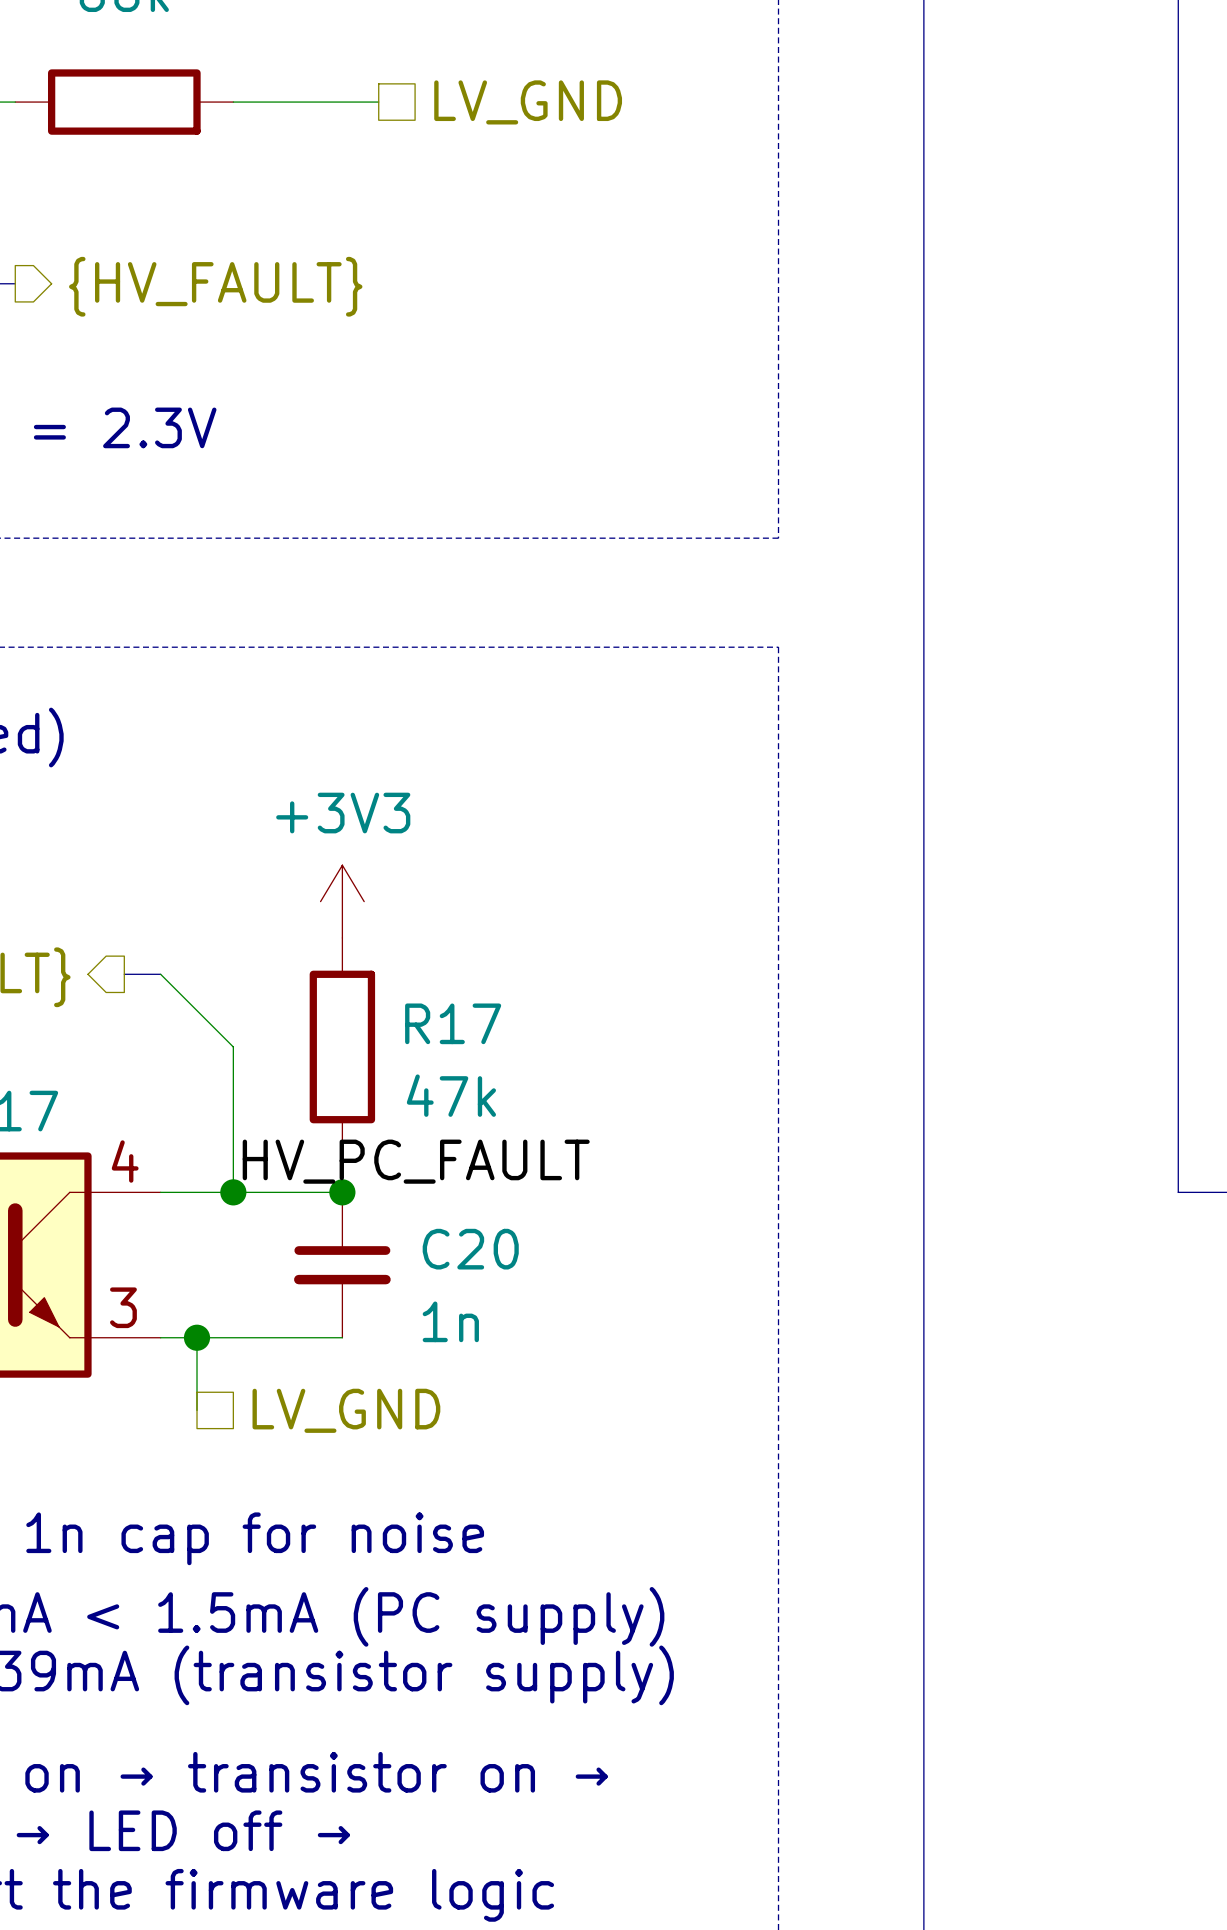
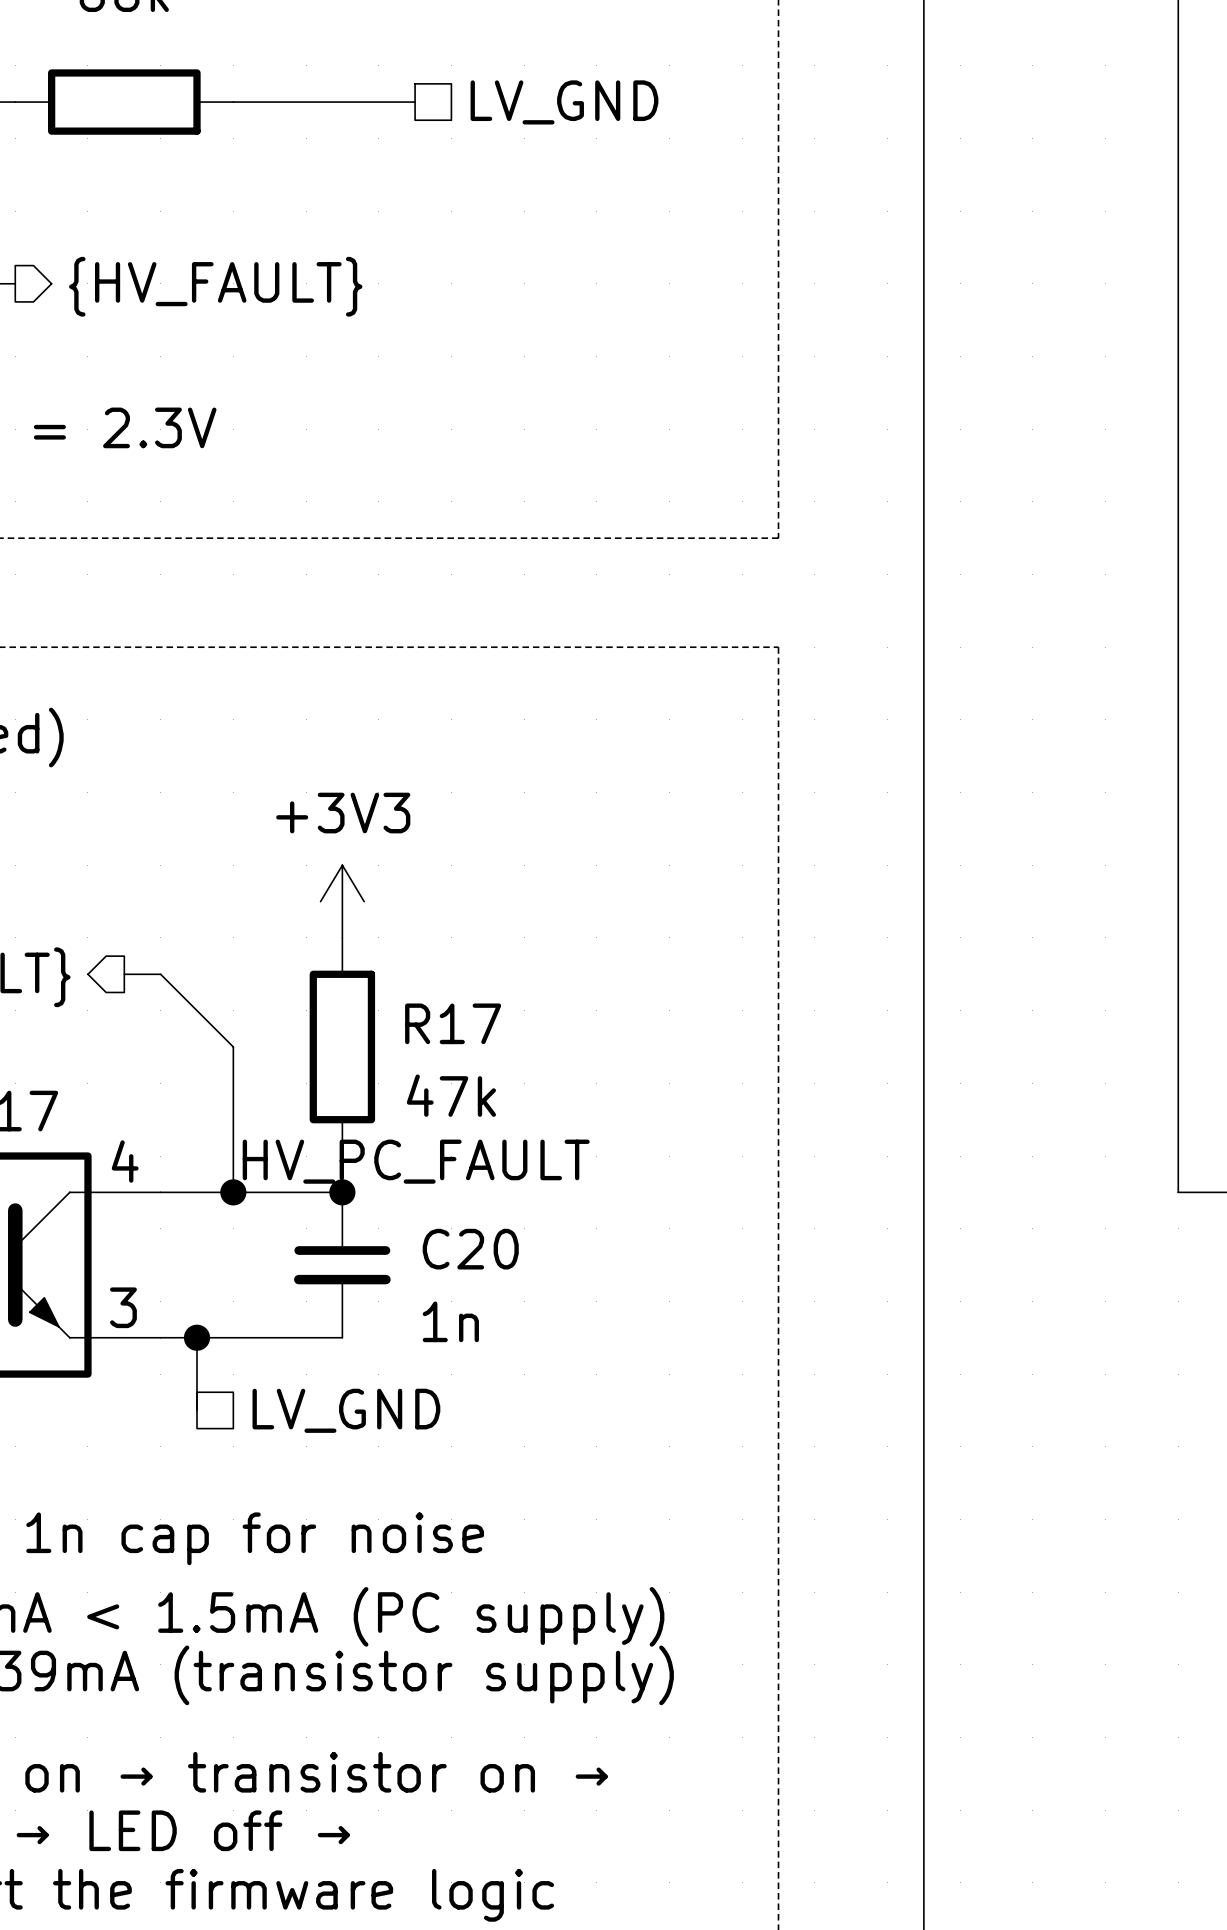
wire: none -> (378, 102) (415, 102)
hierarchical label position: LV_GND (528, 102) -> LV_GND (564, 102)

